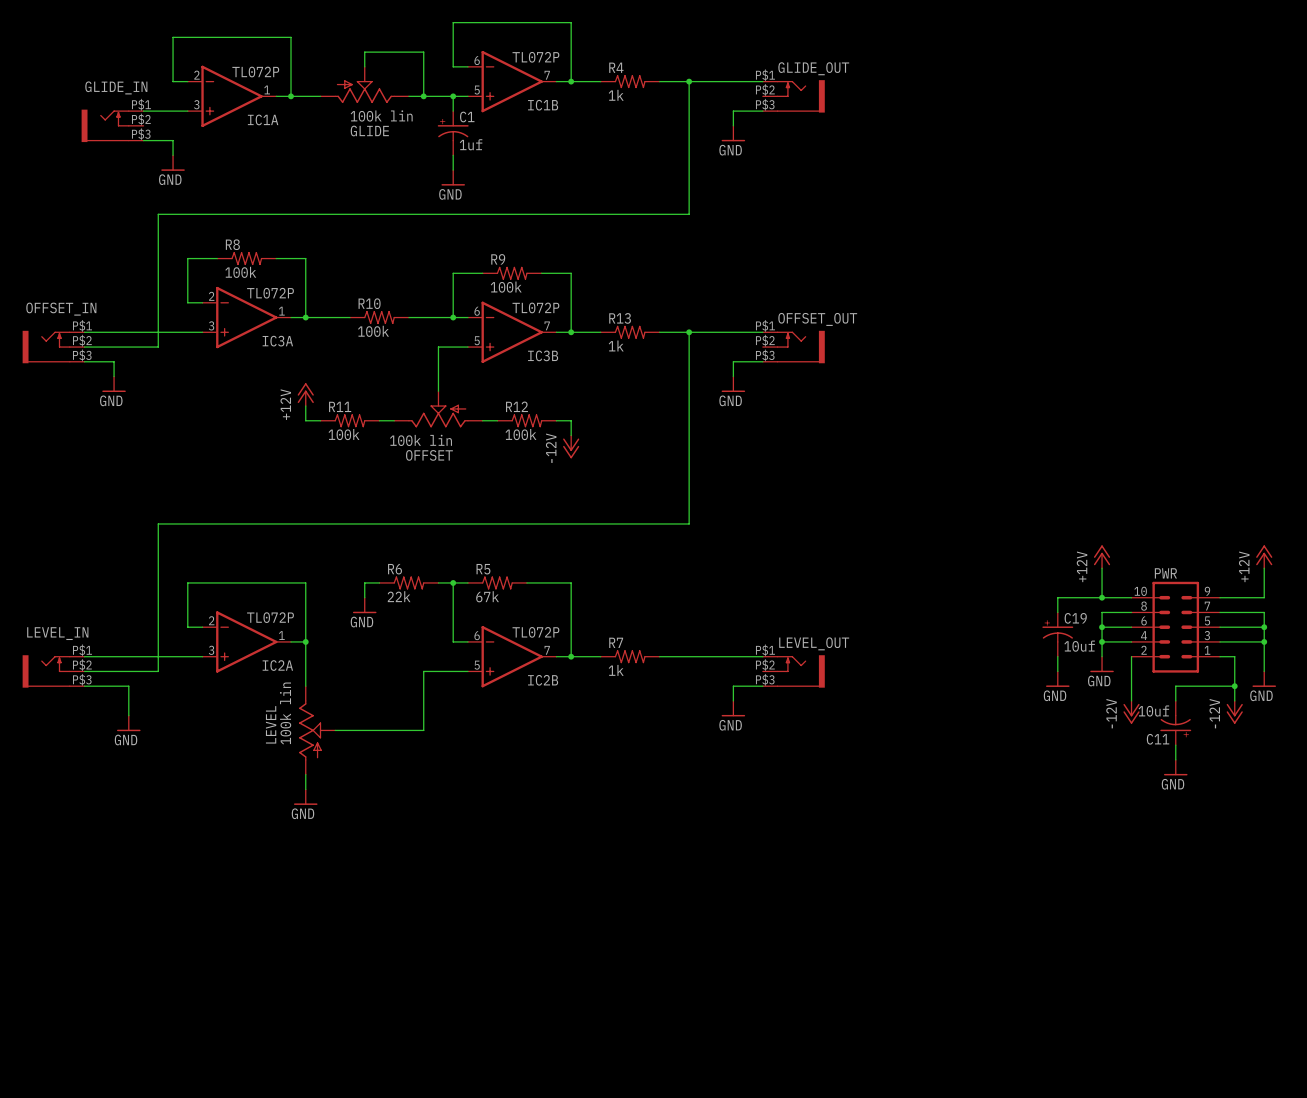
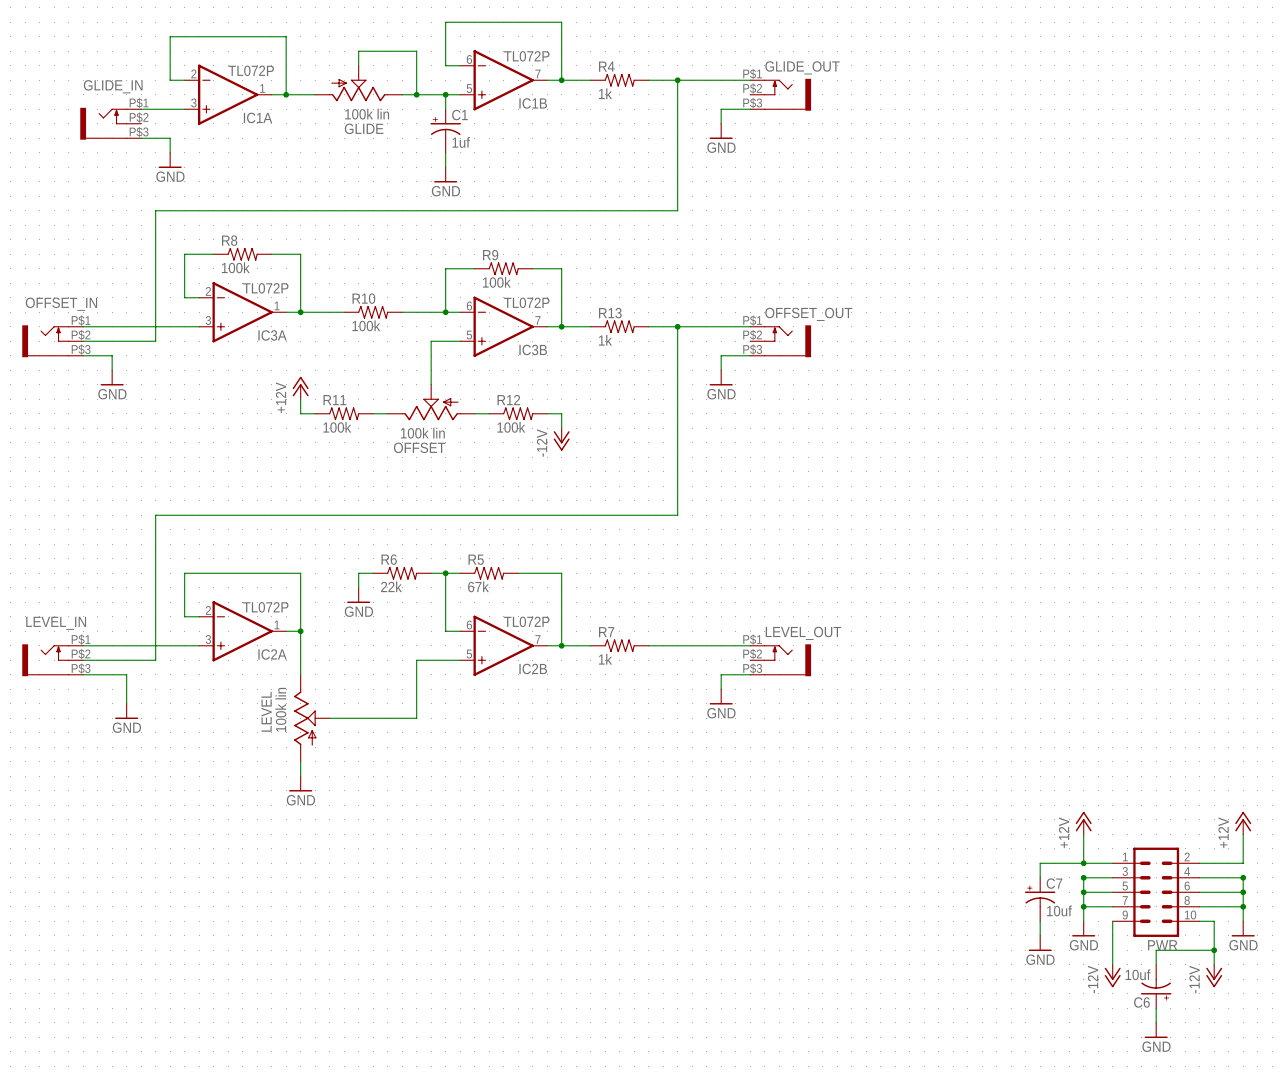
power symbol: +12V (1102, 556) -> none
power symbol: +12V (1264, 556) -> none
wire: (1102, 568) (1102, 597) -> none
wire: (1264, 568) (1264, 597) (1219, 597) -> none
junction: (1102, 597) -> none
wire: (1131, 597) (1057, 597) (1057, 612) -> none
wire: (1131, 612) (1102, 612) (1102, 656) -> none
wire: (1219, 612) (1264, 612) (1264, 671) -> none
wire: (1102, 627) (1131, 627) -> none
junction: (1102, 627) -> none
PWR: (1175, 627) -> none
wire: (1219, 627) (1264, 627) -> none
junction: (1264, 627) -> none
C19: 10uf (1057, 634) -> none
wire: (1102, 641) (1131, 641) -> none
junction: (1102, 641) -> none
wire: (1219, 641) (1264, 641) -> none
junction: (1264, 641) -> none
wire: (1057, 656) (1057, 671) -> none
wire: (1131, 656) (1131, 700) -> none
wire: (1219, 656) (1234, 656) (1234, 700) -> none
power symbol: GND (1102, 664) -> none
power symbol: GND (1057, 679) -> none
power symbol: GND (1264, 679) -> none
wire: (1234, 686) (1175, 686) (1175, 700) -> none
junction: (1234, 686) -> none
power symbol: -12V (1131, 712) -> none
power symbol: -12V (1234, 712) -> none
C11: 10uf (1175, 723) -> none
wire: (1175, 745) (1175, 759) -> none
power symbol: GND (1175, 767) -> none
power symbol: none -> +12V (1083, 823)
power symbol: none -> +12V (1243, 823)
wire: none -> (1083, 834) (1083, 863)
wire: none -> (1243, 834) (1243, 863) (1199, 863)
junction: none -> (1083, 863)
wire: none -> (1112, 863) (1040, 863) (1040, 877)
junction: none -> (1083, 877)
wire: none -> (1112, 877) (1083, 877) (1083, 921)
wire: none -> (1199, 877) (1243, 877) (1243, 921)
junction: none -> (1243, 877)
wire: none -> (1083, 892) (1112, 892)
junction: none -> (1083, 892)
PWR: none -> (1156, 892)
wire: none -> (1199, 892) (1243, 892)
junction: none -> (1243, 892)
C7: none -> 10uf (1040, 899)
wire: none -> (1083, 906) (1112, 906)
junction: none -> (1083, 906)
wire: none -> (1199, 906) (1243, 906)
junction: none -> (1243, 906)
wire: none -> (1040, 921) (1040, 935)
wire: none -> (1112, 921) (1112, 964)
wire: none -> (1199, 921) (1214, 921) (1214, 964)
power symbol: none -> GND (1083, 928)
power symbol: none -> GND (1243, 928)
power symbol: none -> GND (1040, 943)
wire: none -> (1214, 950) (1156, 950) (1156, 964)
junction: none -> (1214, 950)
power symbol: none -> -12V (1112, 976)
power symbol: none -> -12V (1214, 976)
C6: none -> 10uf (1156, 986)
wire: none -> (1156, 1008) (1156, 1022)
power symbol: none -> GND (1156, 1030)

